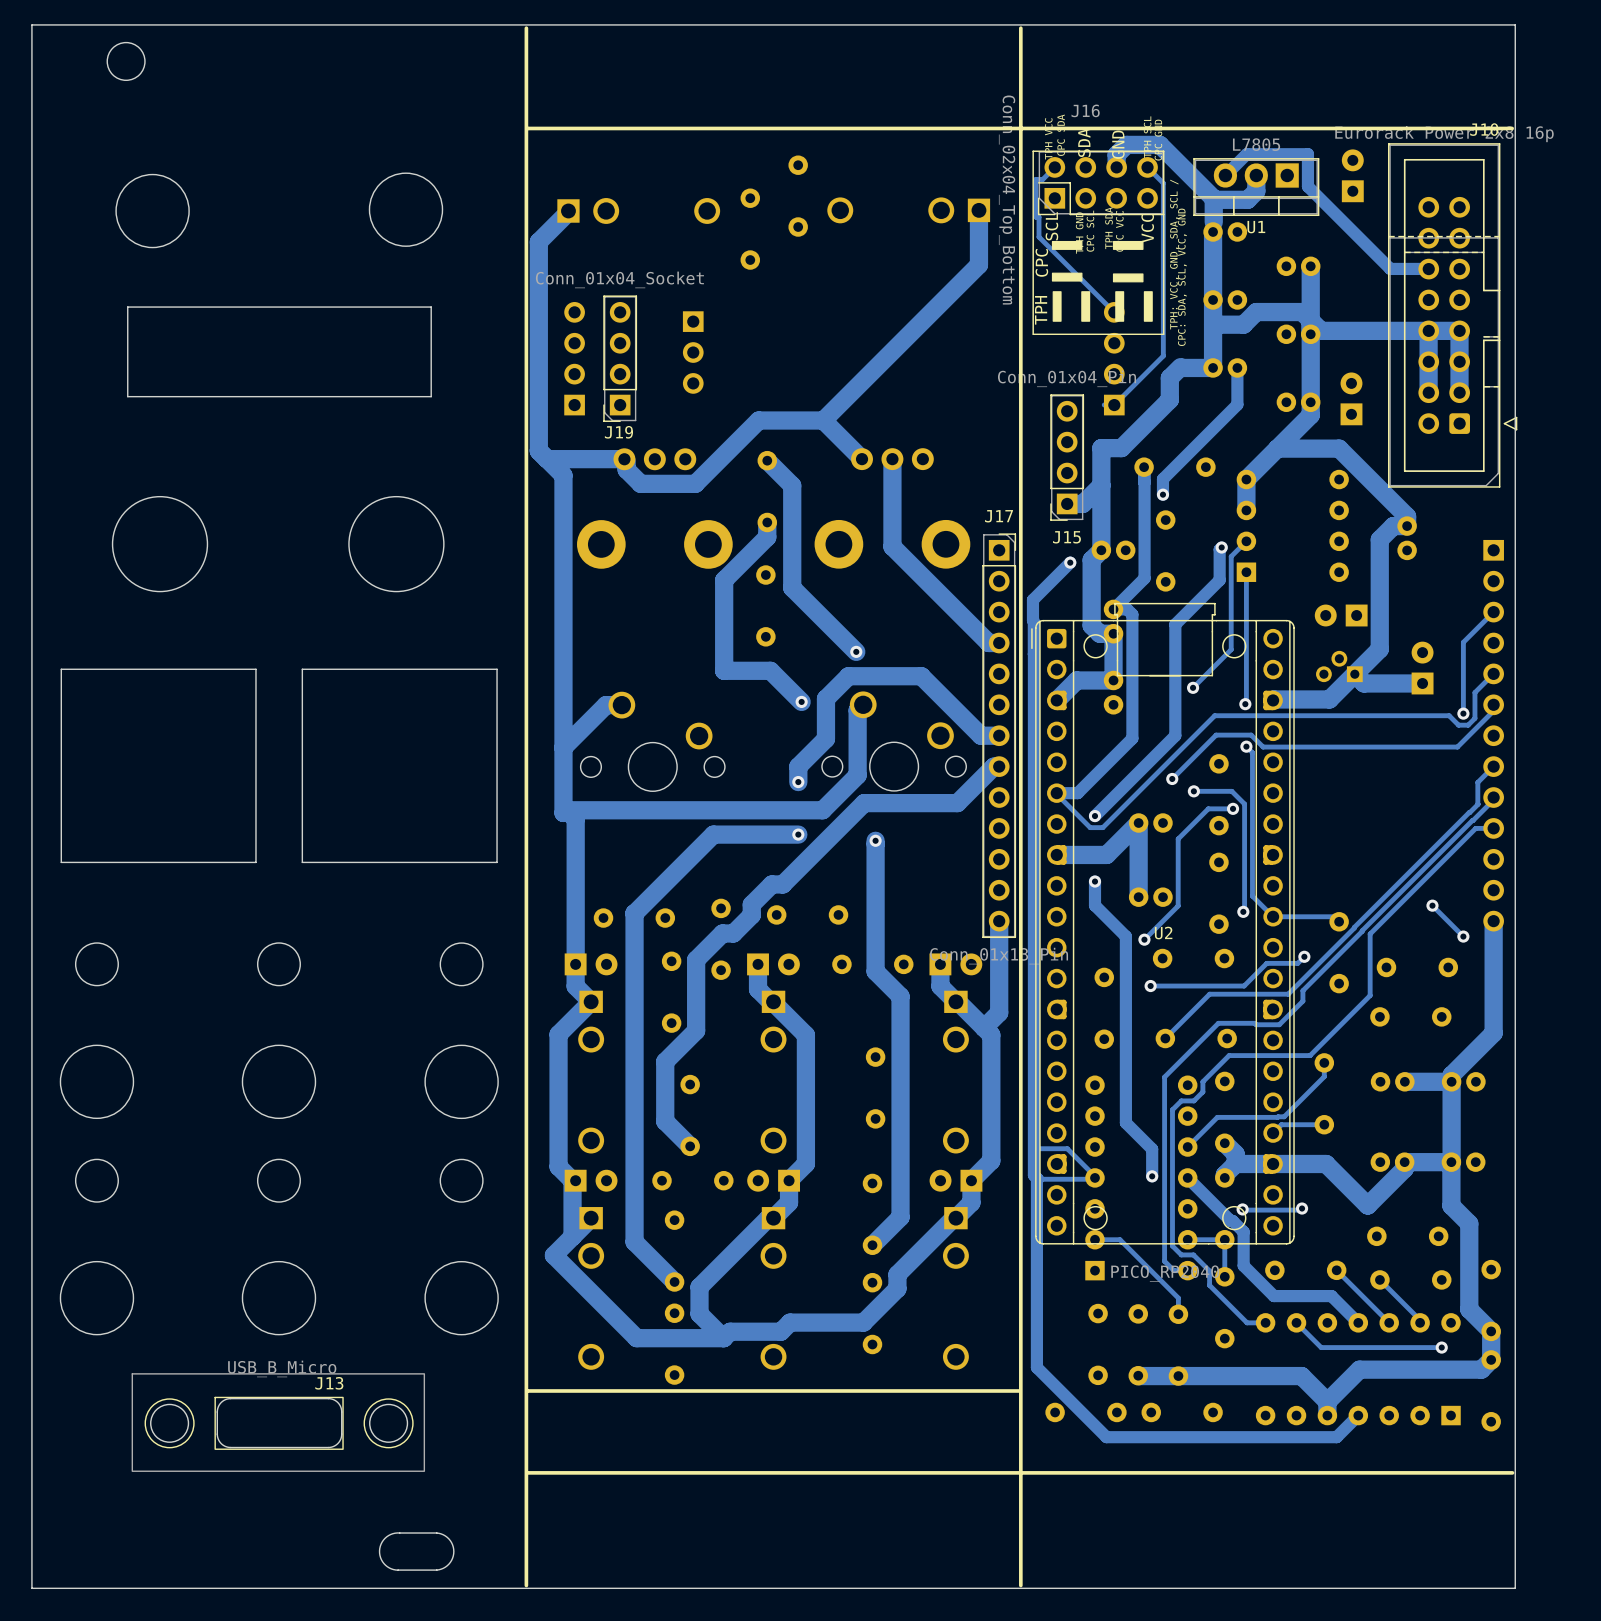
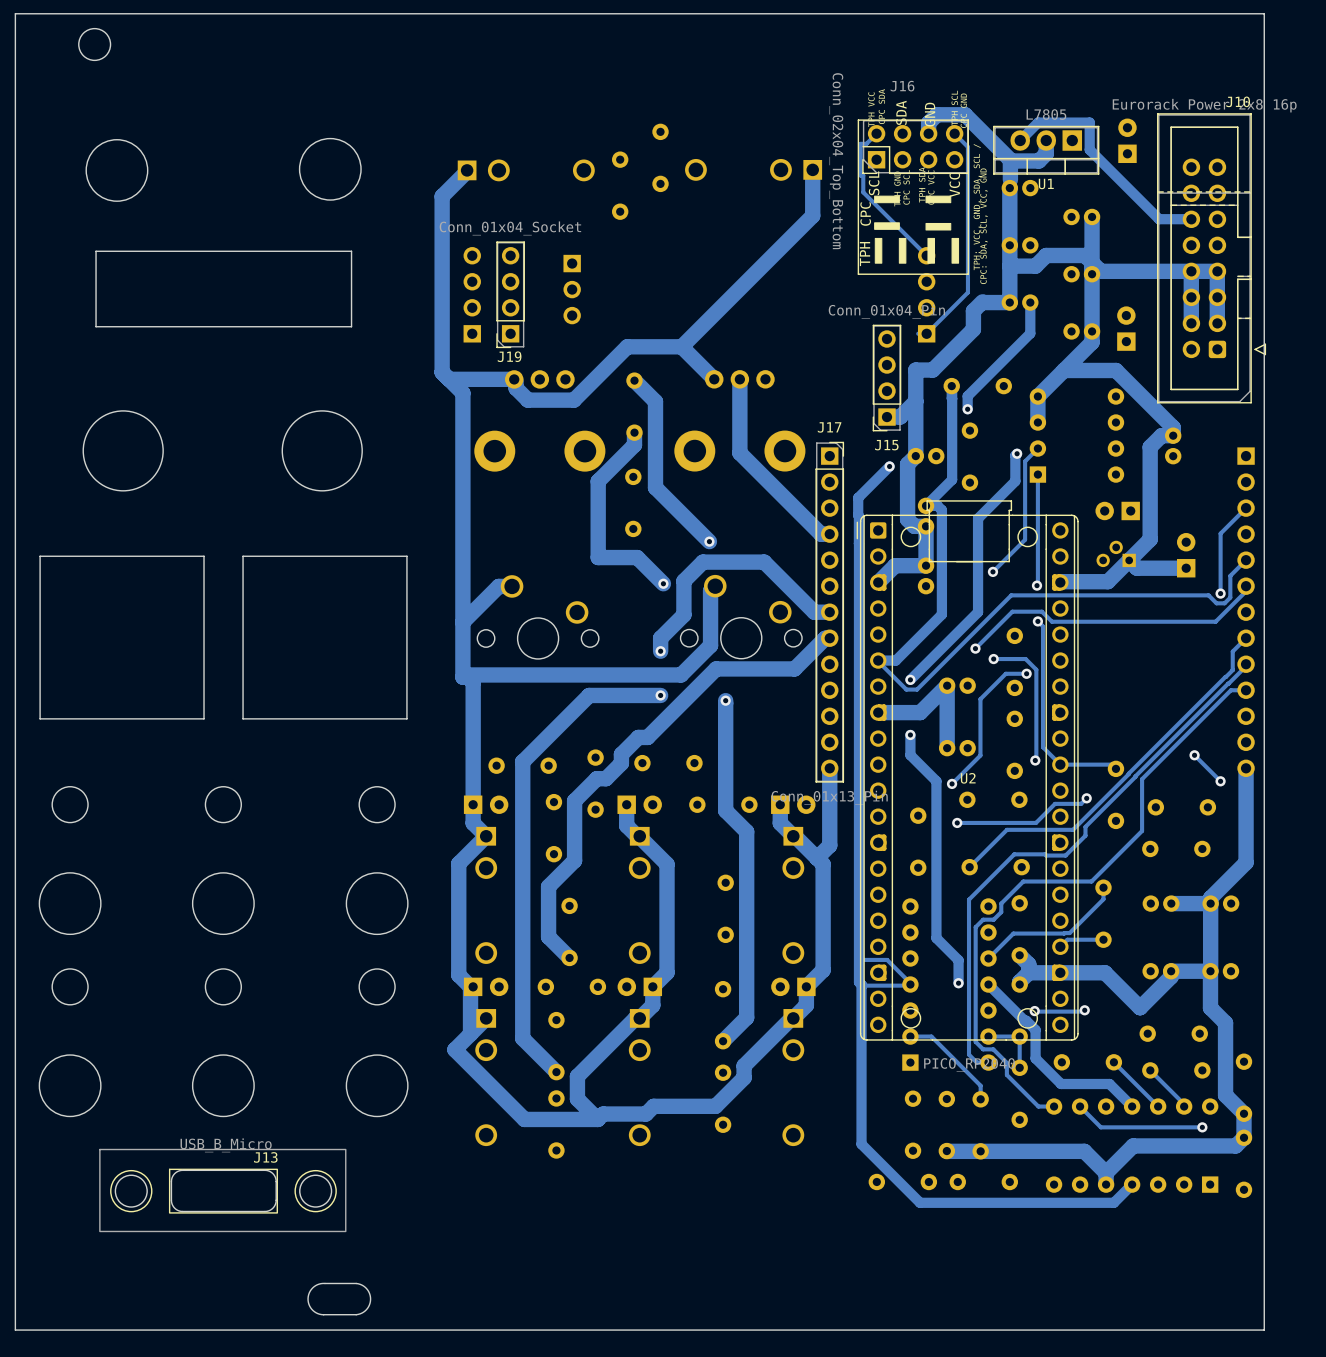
line: (526, 28) (526, 1585) -> none
line: (1020, 28) (1020, 1585) -> none
line: (1512, 128) (527, 128) -> none
line: (1019, 1390) (527, 1390) -> none
line: (1512, 1472) (528, 1472) -> none

